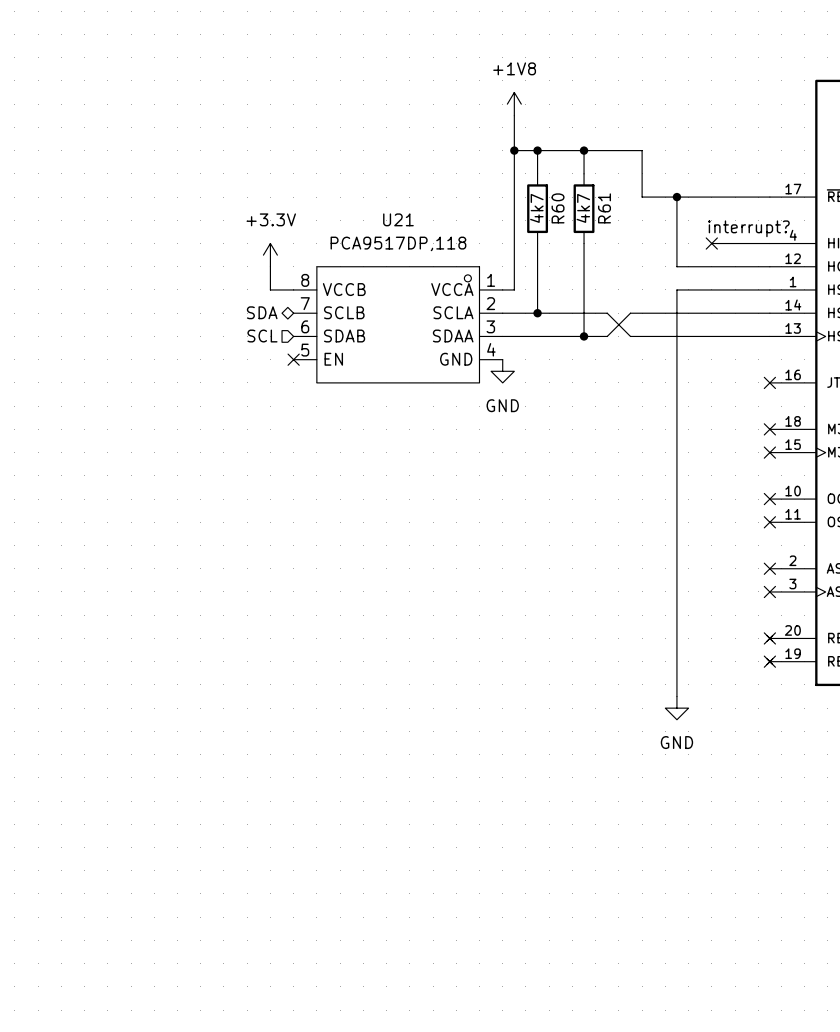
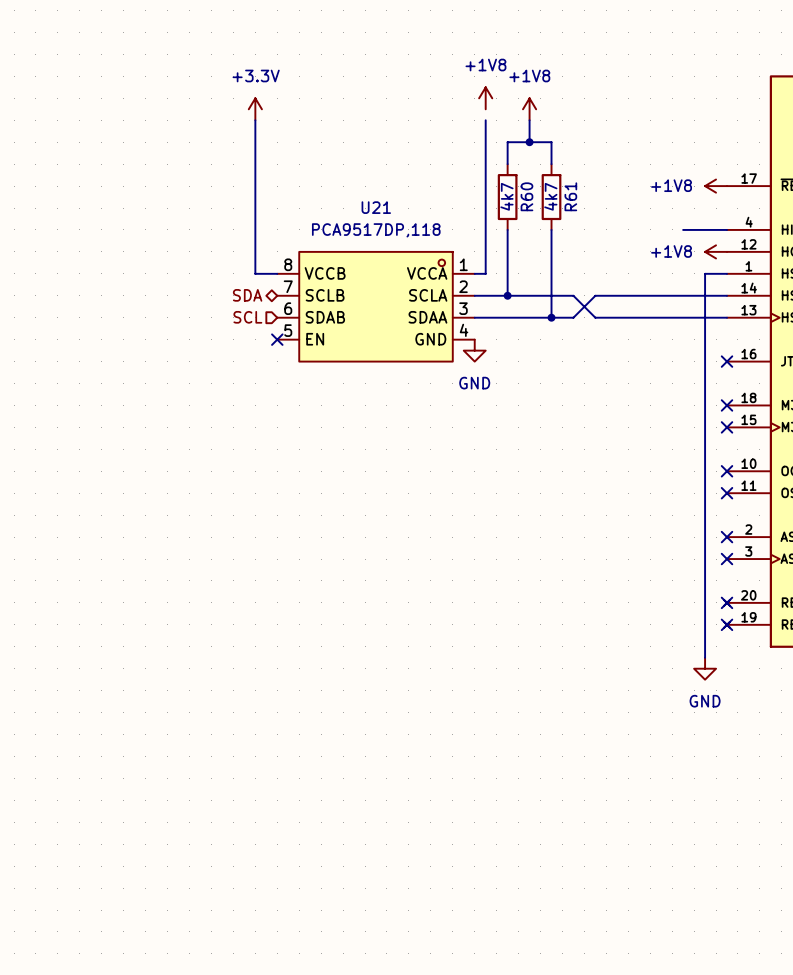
wire: (514, 115) (514, 127) -> none
power symbol: none -> +1V8 (529, 109)
wire: none -> (255, 120) (255, 251)
wire: none -> (529, 120) (529, 142)
wire: (514, 150) (537, 150) -> none
junction: (514, 150) -> none
junction: (537, 150) -> none
junction: none -> (529, 142)
wire: (584, 150) (642, 150) (642, 197) (769, 197) -> none
junction: (584, 150) -> none
wire: (676, 197) (676, 266) (769, 266) -> none
junction: (676, 197) -> none
power symbol: none -> +1V8 (716, 186)
text: interrupt? (748, 228) -> none
wire: (711, 243) (723, 243) -> none
no-connect mark: (711, 243) -> none
power symbol position: +3.3V (270, 255) -> +3.3V (255, 109)
power symbol: none -> +1V8 (716, 251)
wire: (746, 289) (676, 289) (676, 696) -> (705, 273) (705, 657)
power symbol position: GND (676, 708) -> GND (705, 668)

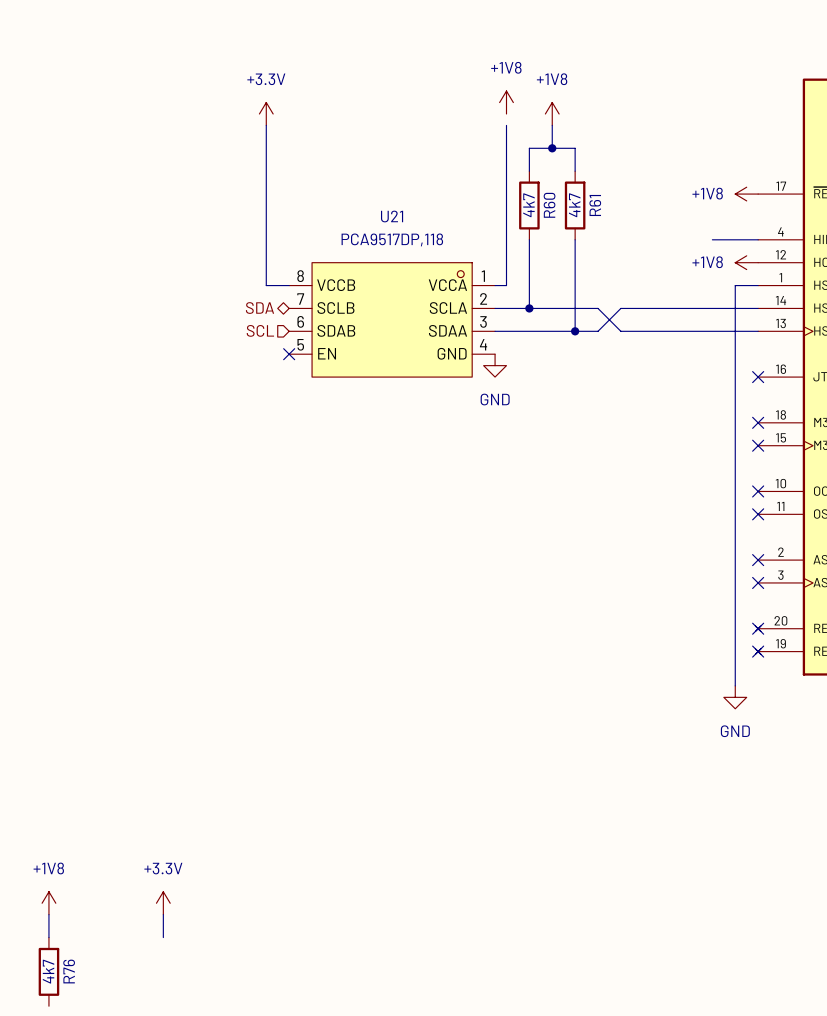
power symbol: none -> +1V8 (48, 903)
power symbol: none -> +3.3V (163, 903)
wire: none -> (48, 914) (48, 937)
wire: none -> (163, 914) (163, 937)
R76: none -> 4k7 (48, 971)

